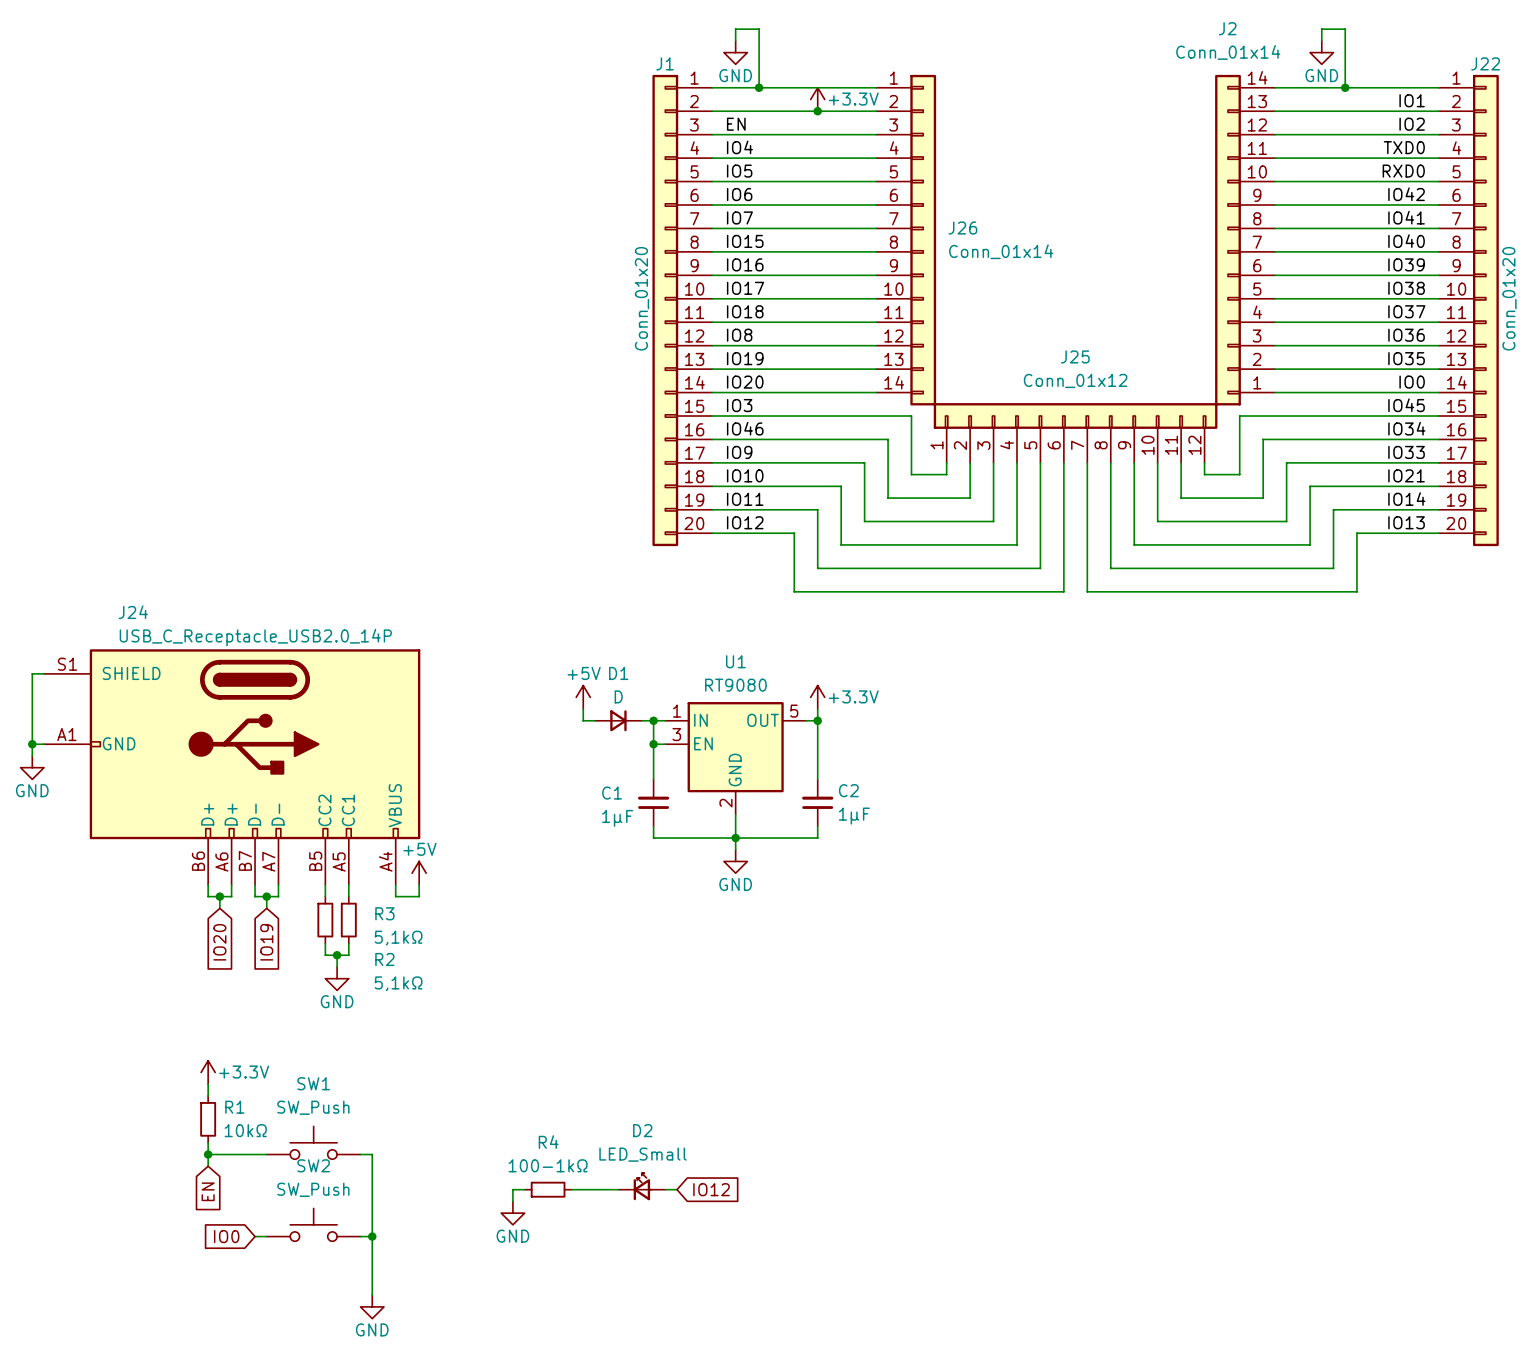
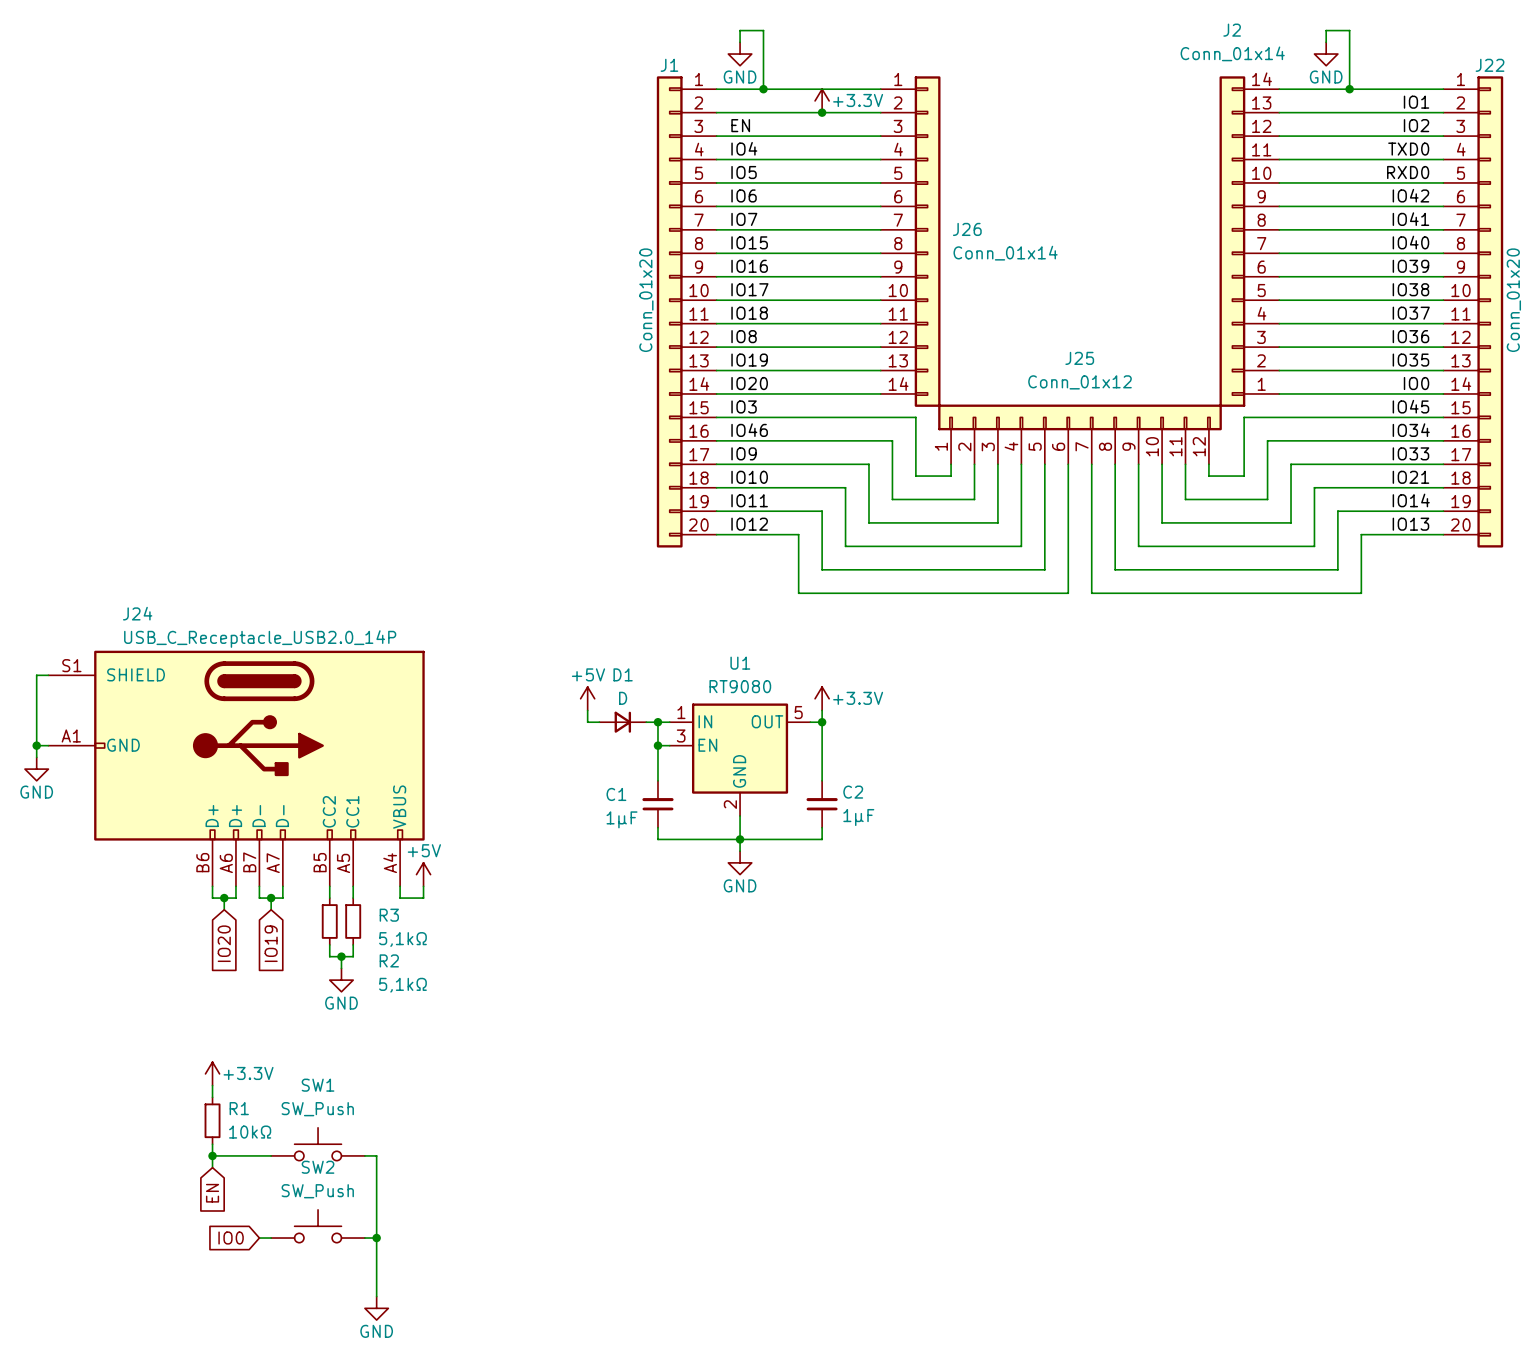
D2: LED_Small (641, 1186) -> none
wire: (524, 1189) (512, 1189) (512, 1201) -> none
R4: 100-1kΩ (548, 1189) -> none
wire: (571, 1189) (618, 1189) -> none
wire: (665, 1189) (677, 1189) -> none
global label: IO12 (711, 1189) -> none
power symbol: GND (512, 1213) -> none

